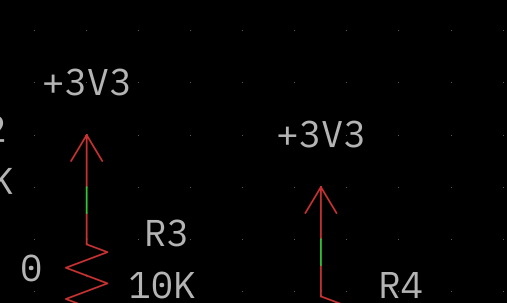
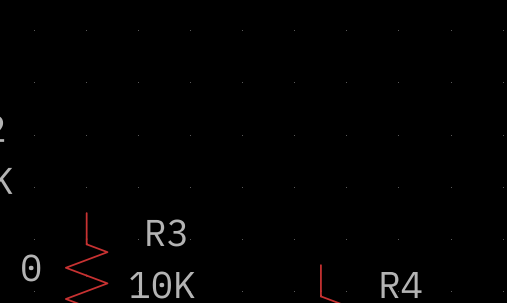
power symbol: +3V3 (86, 161) -> none
wire: (86, 187) (86, 213) -> none
power symbol: +3V3 (320, 213) -> none
wire: (320, 239) (320, 265) -> none

